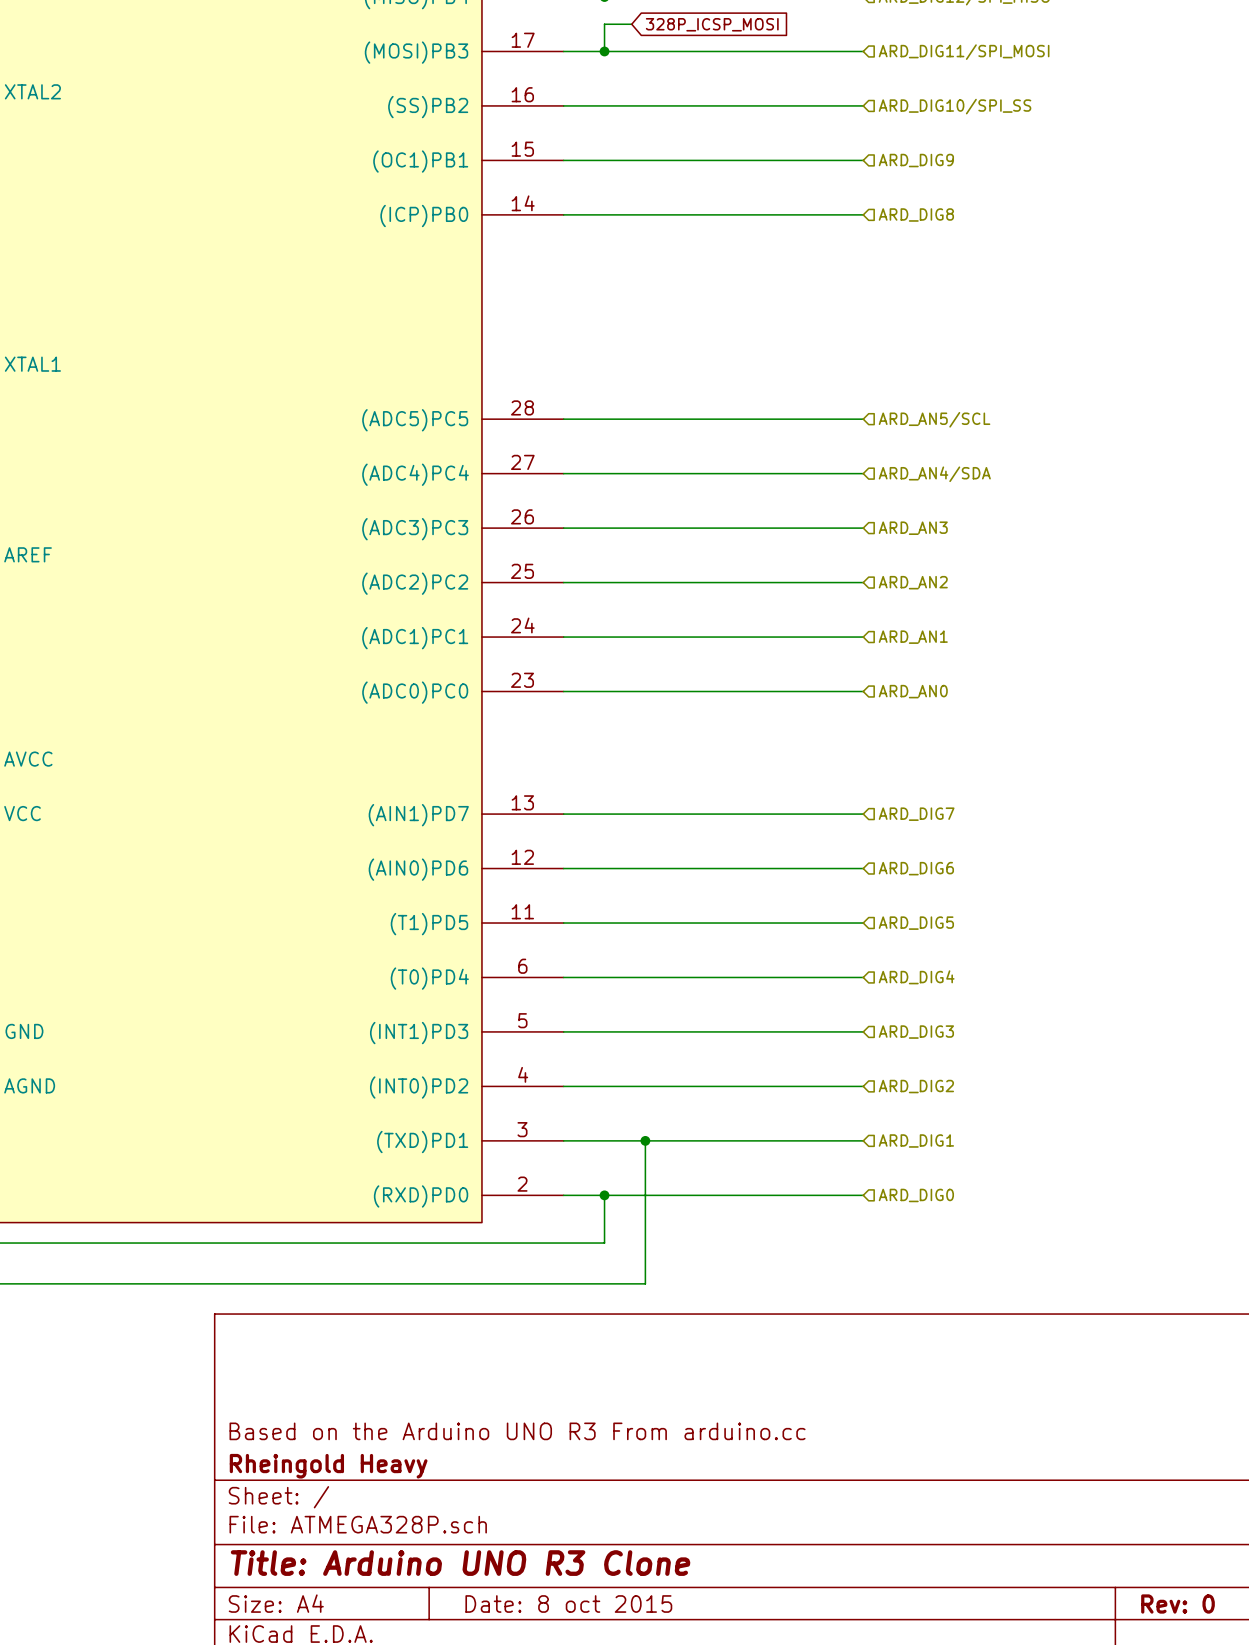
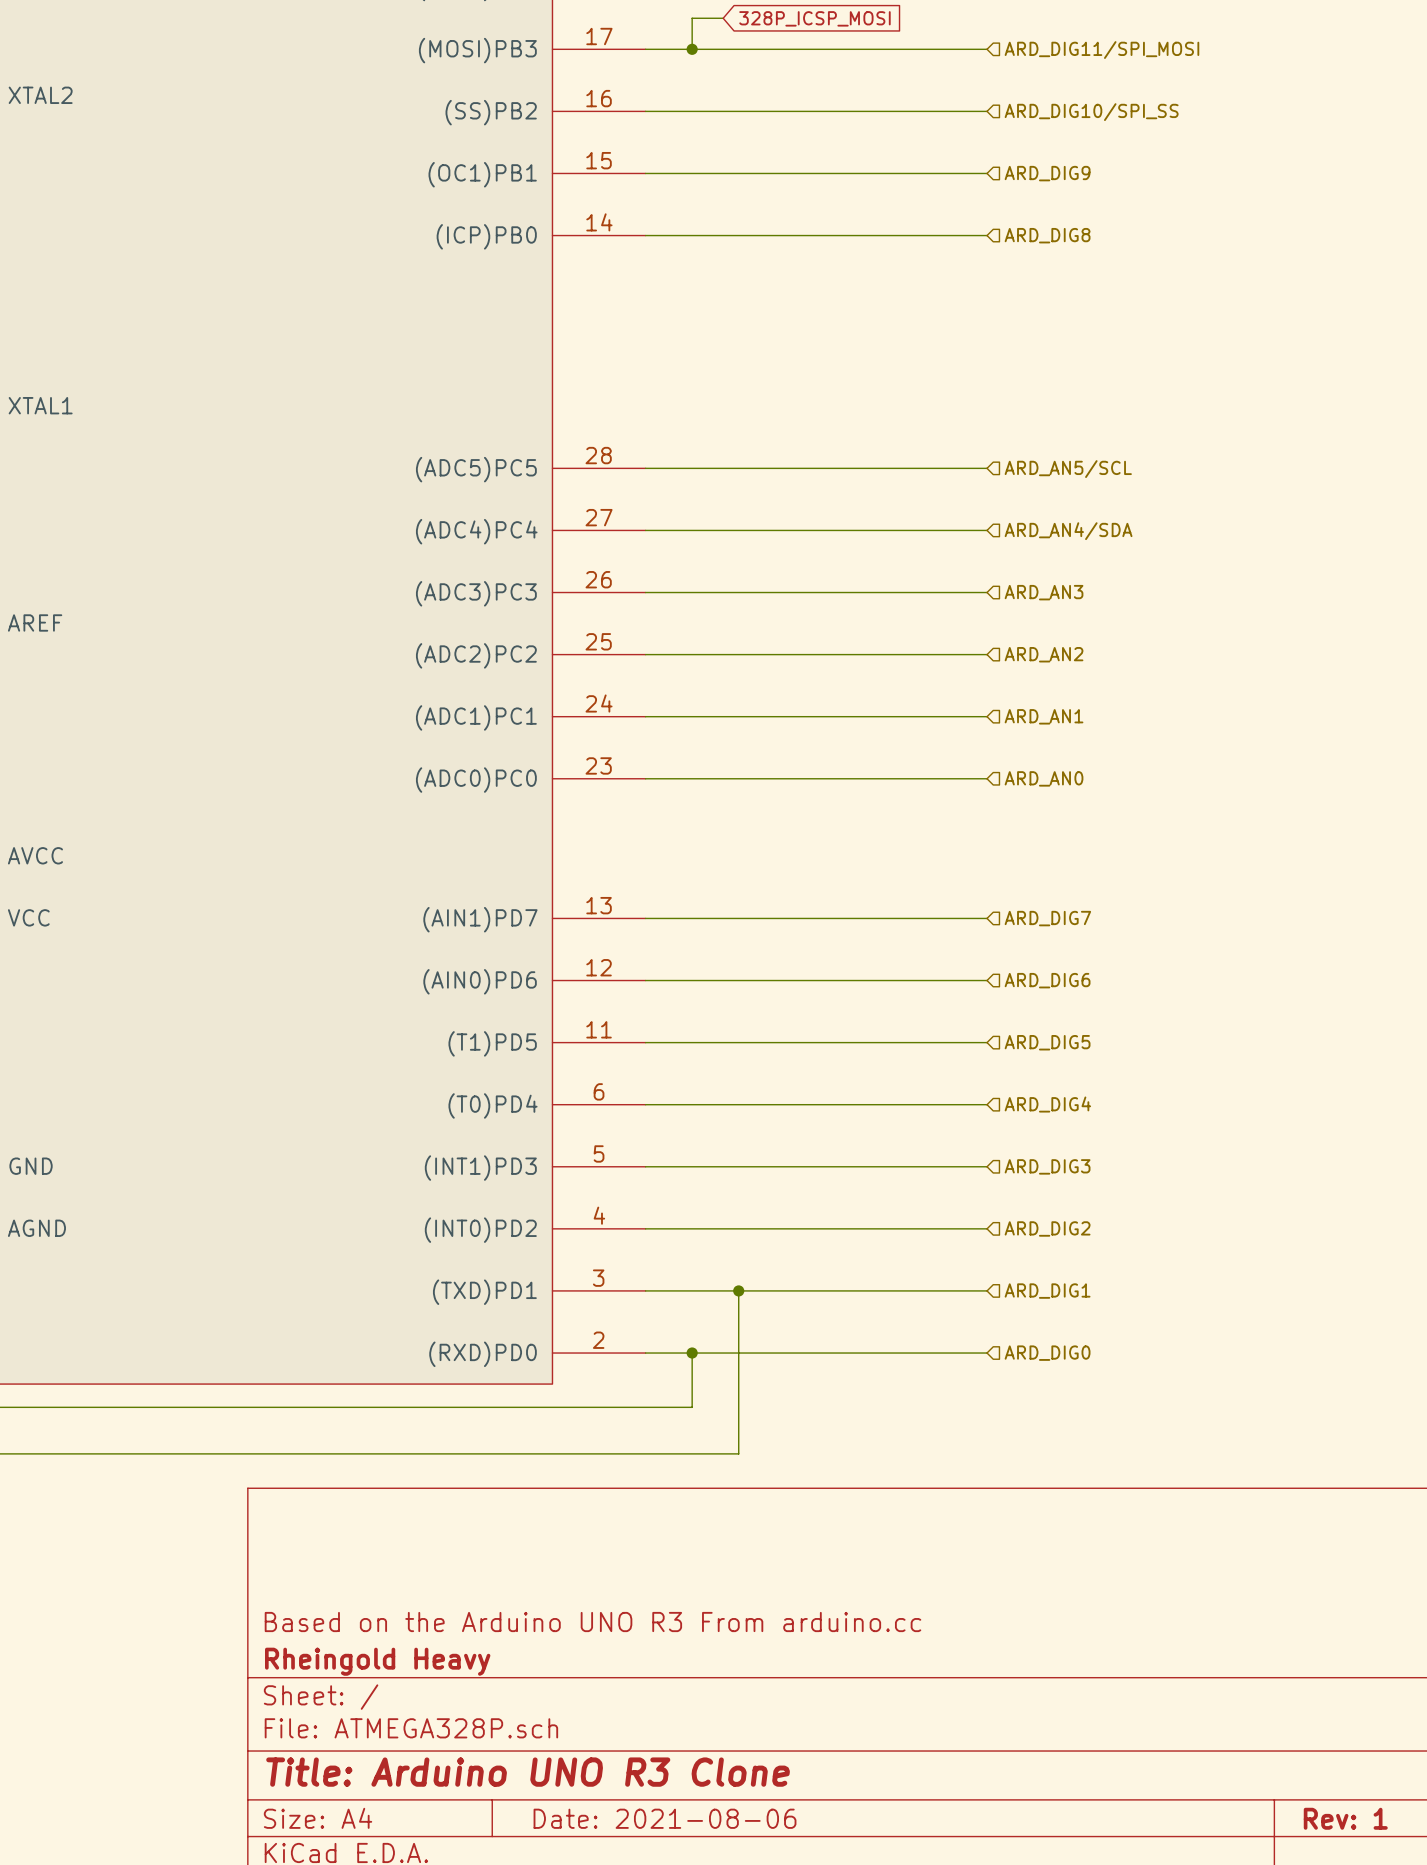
title block: Date: 8 oct 2015 (568, 1604) -> Date: 2021-08-06 (665, 1818)
title block: Rev: 0 (1177, 1604) -> Rev: 1 (1345, 1818)

